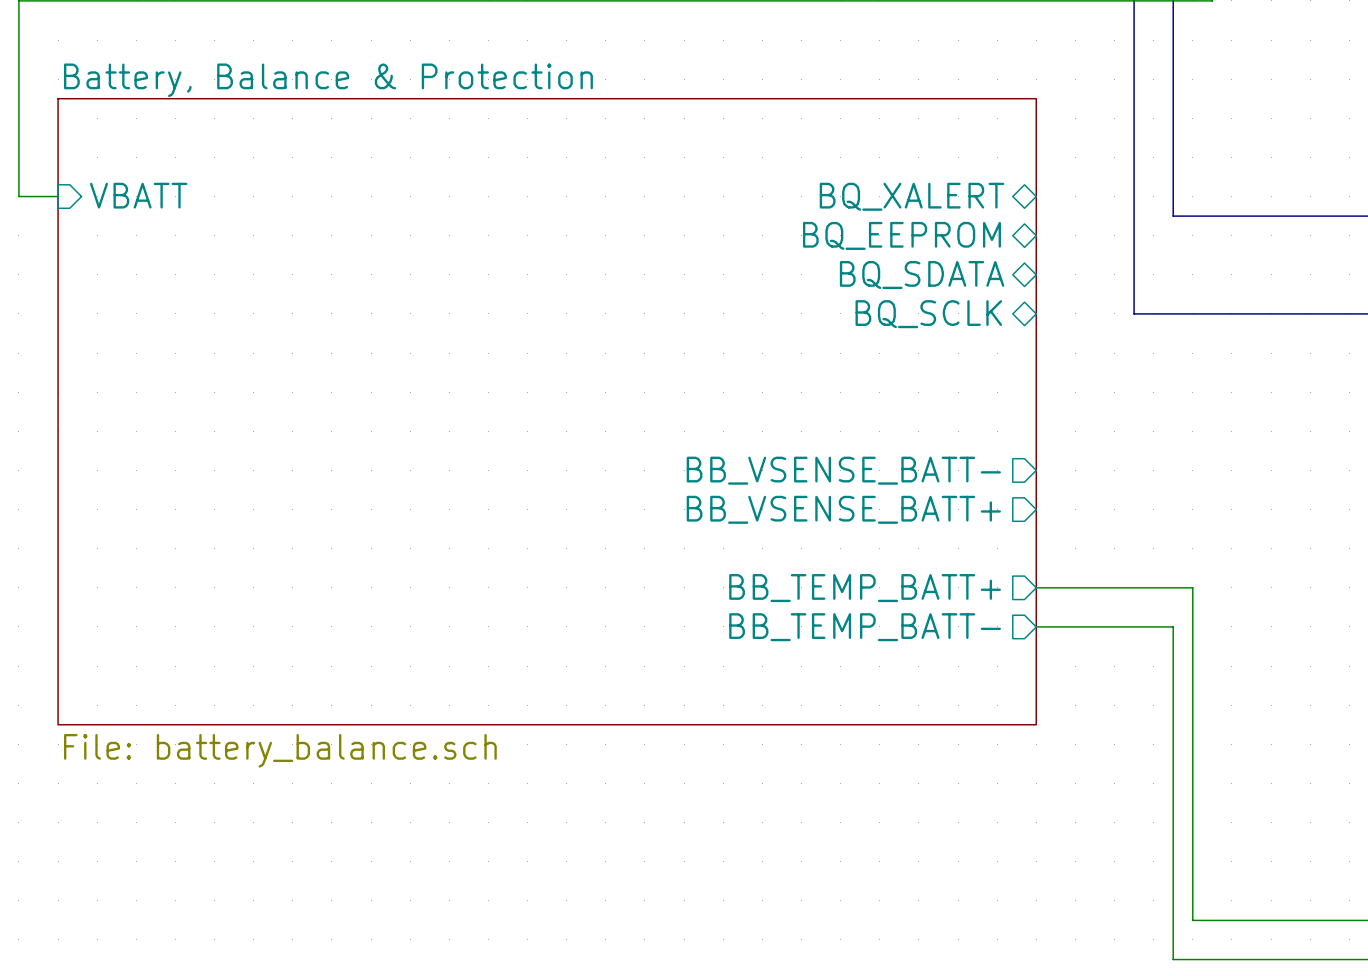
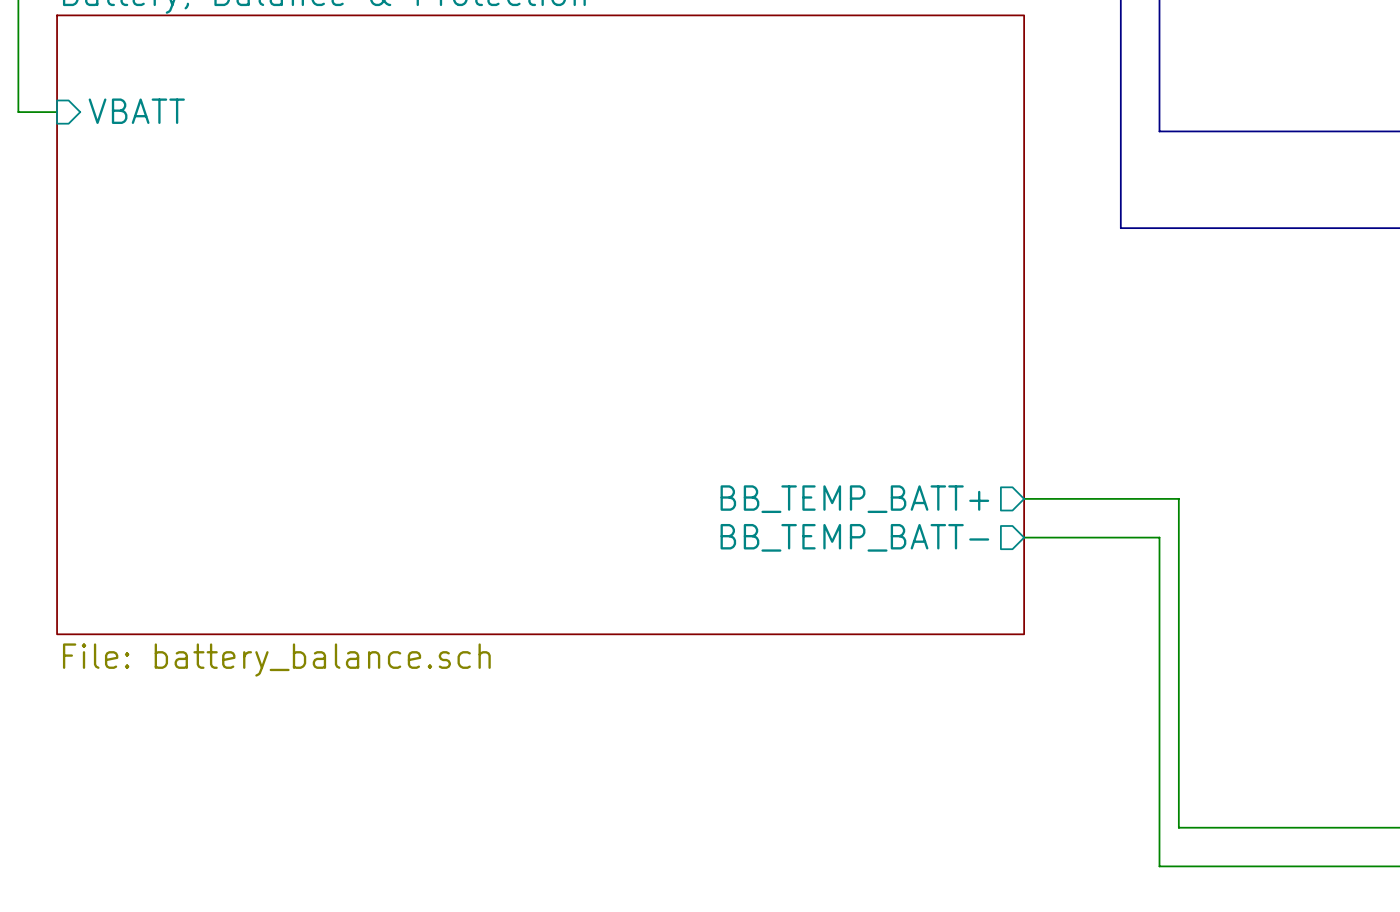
sheet pin: BQ_XALERT (912, 196) -> none
sheet pin: BQ_EEPROM (901, 235) -> none
sheet pin: BQ_SDATA (922, 275) -> none
sheet pin: BQ_SCLK (928, 314) -> none
sheet pin: BB_VSENSE_BATT- (843, 470) -> none
sheet pin: BB_VSENSE_BATT+ (843, 509) -> none

